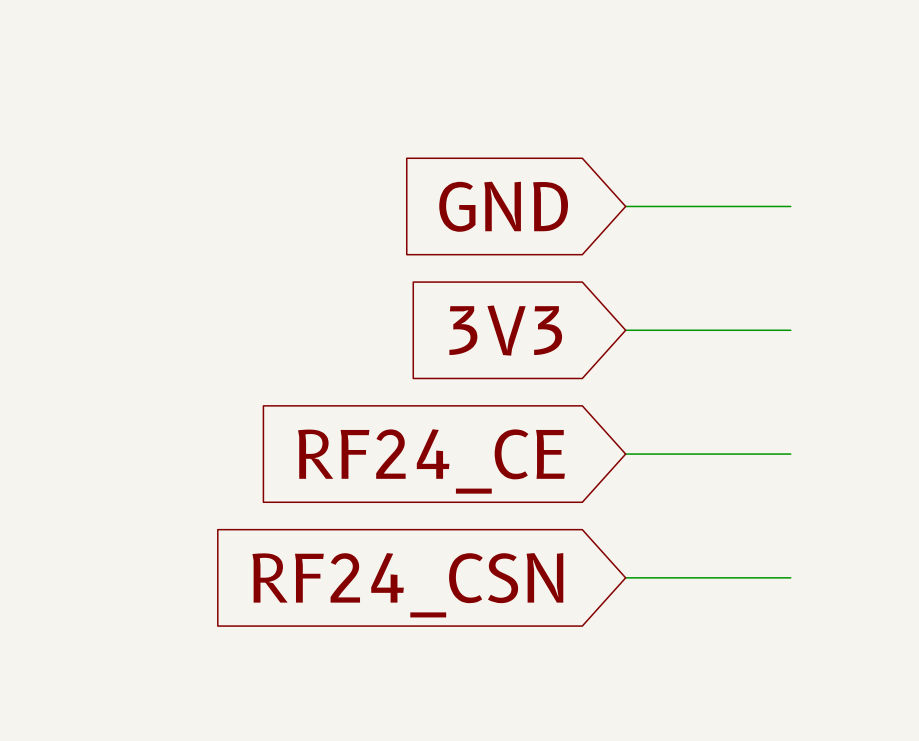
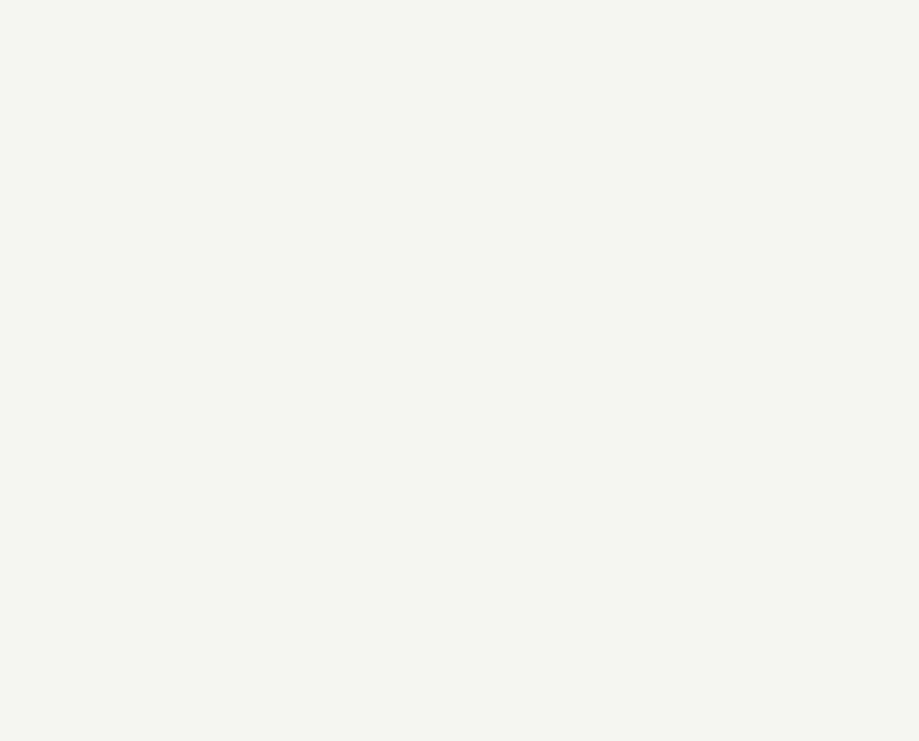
global label: GND (503, 206) -> none
wire: (625, 206) (790, 206) -> none
global label: 3V3 (505, 330) -> none
wire: (625, 330) (790, 330) -> none
wire: (625, 454) (790, 454) -> none
global label: RF24_CE (431, 461) -> none
wire: (625, 577) (790, 577) -> none
global label: RF24_CSN (407, 585) -> none

